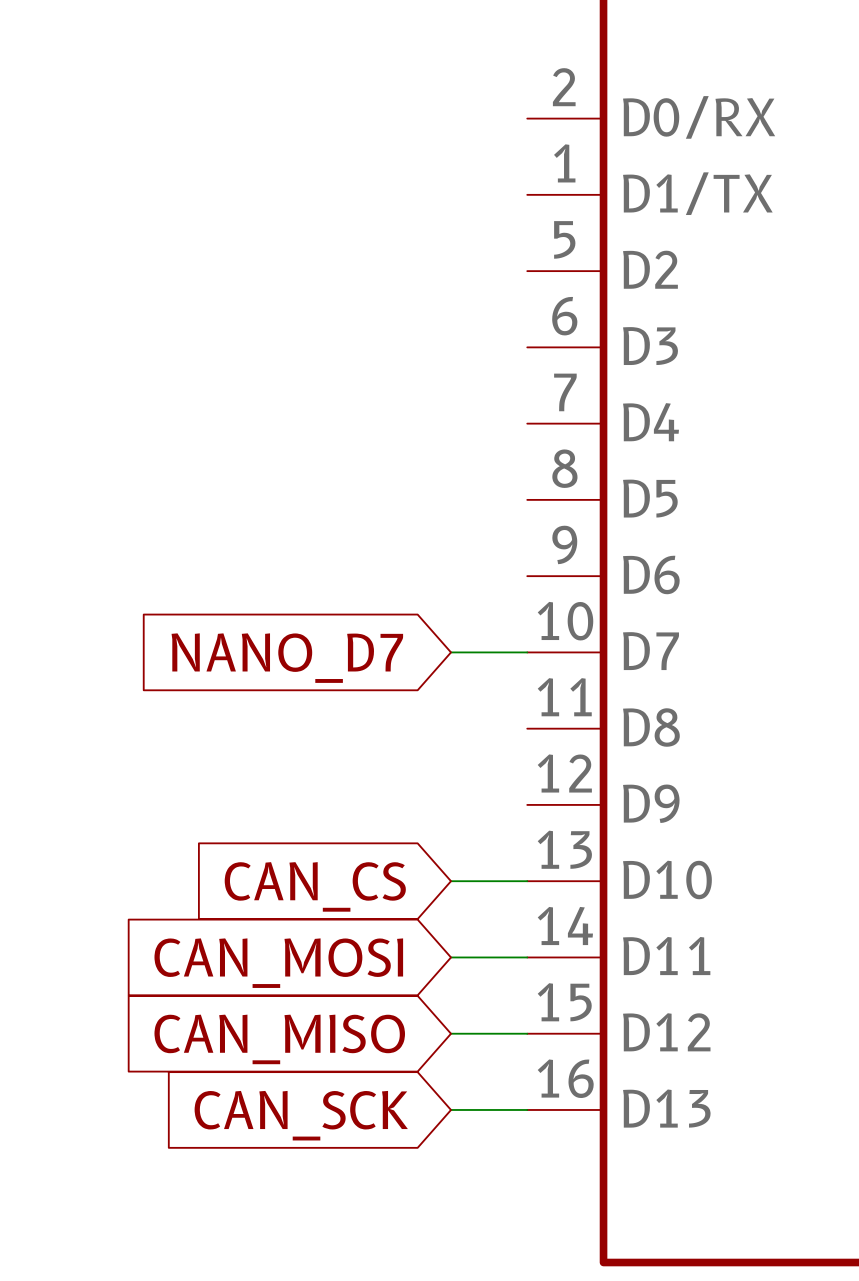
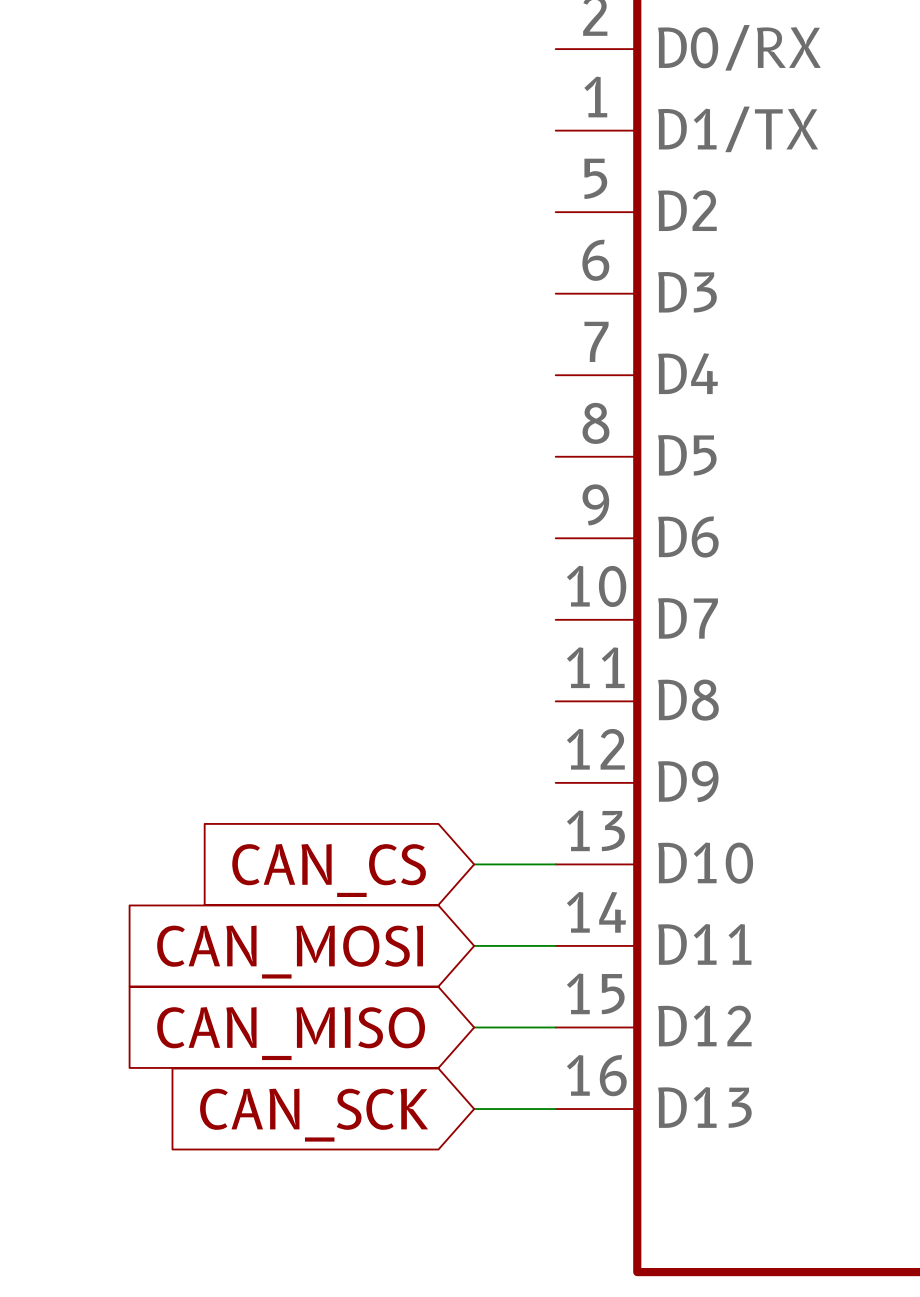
wire: (451, 652) (527, 652) -> none
global label: NANO_D7 (287, 658) -> none

